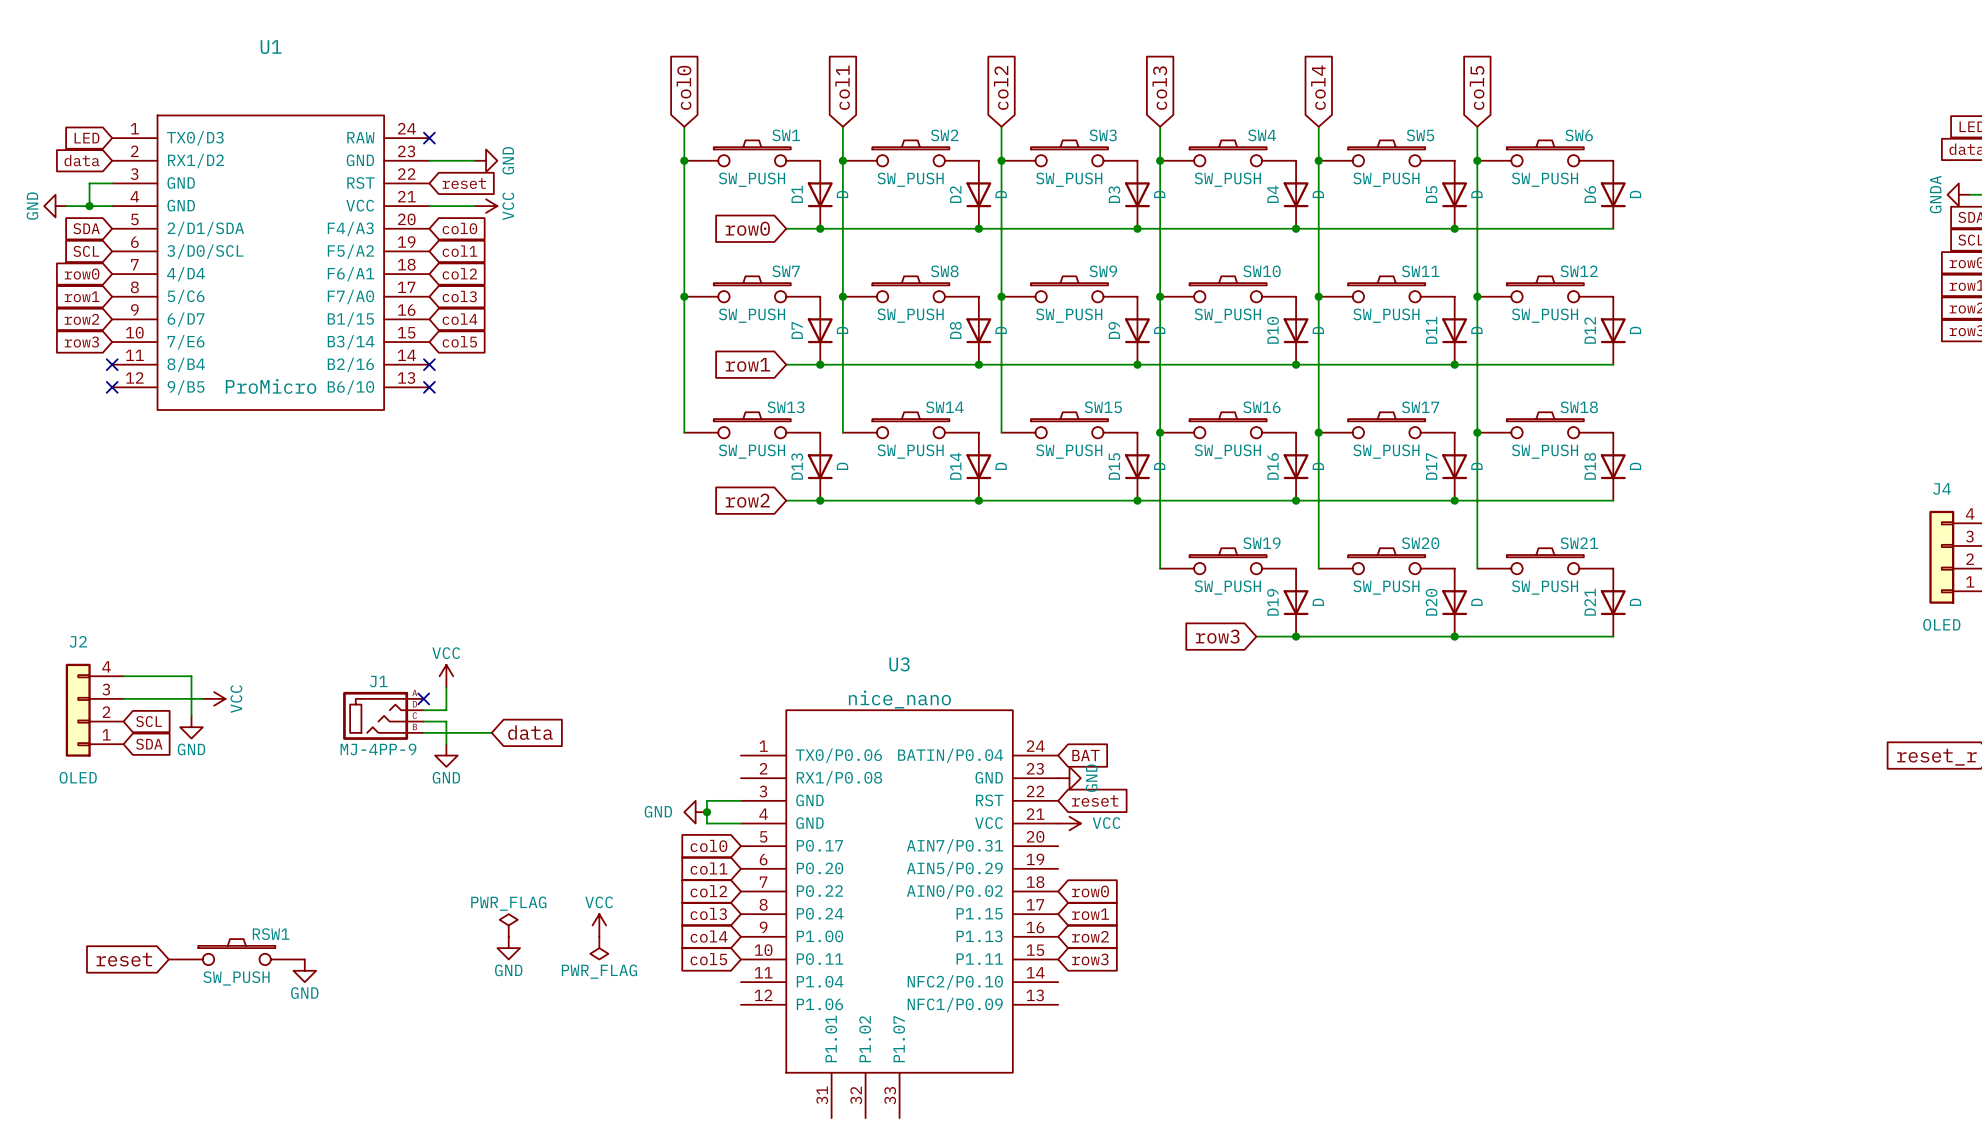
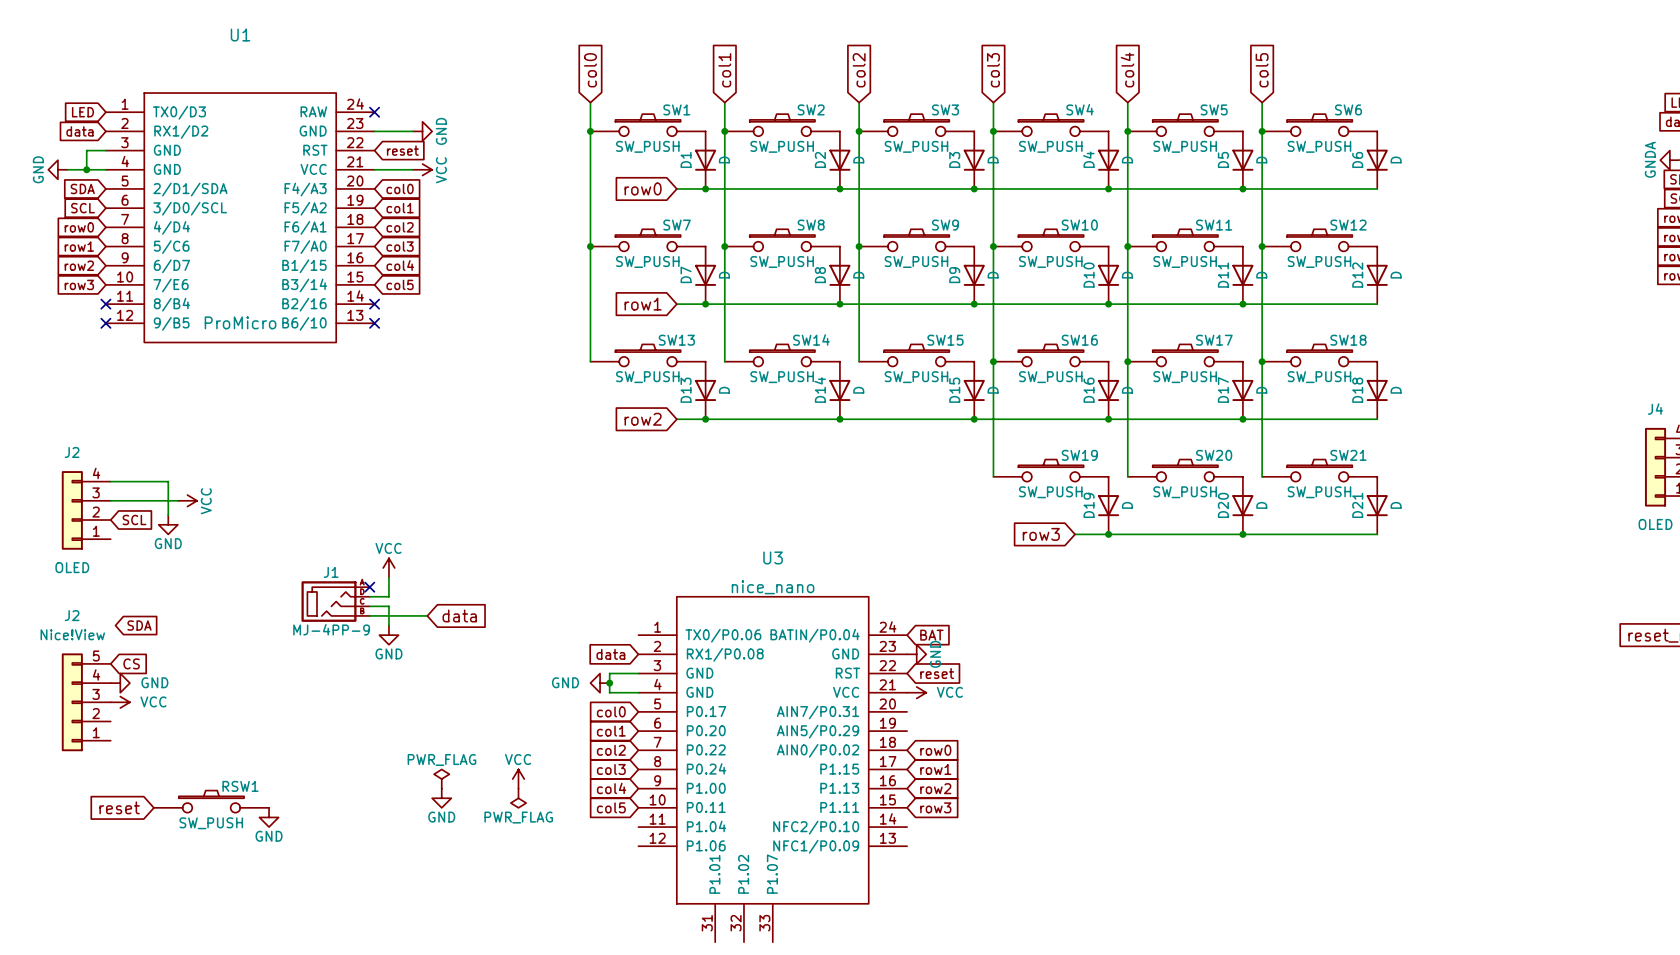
power symbol: none -> VCC (187, 500)
power symbol: none -> GND (168, 524)
wire: (123, 676) (191, 676) (191, 715) -> (110, 481) (168, 481) (168, 515)
wire: (123, 698) (202, 698) -> (110, 500) (177, 500)
power symbol: VCC (214, 698) -> none
J2 position: (94, 710) -> (86, 510)
global label position: SCL (149, 721) -> SCL (134, 520)
power symbol: GND (191, 727) -> none
global label: none -> data (610, 654)
global label: none -> CS (131, 663)
power symbol: none -> GND (120, 683)
J2: none -> Nice!View (86, 702)
power symbol: none -> VCC (120, 702)

